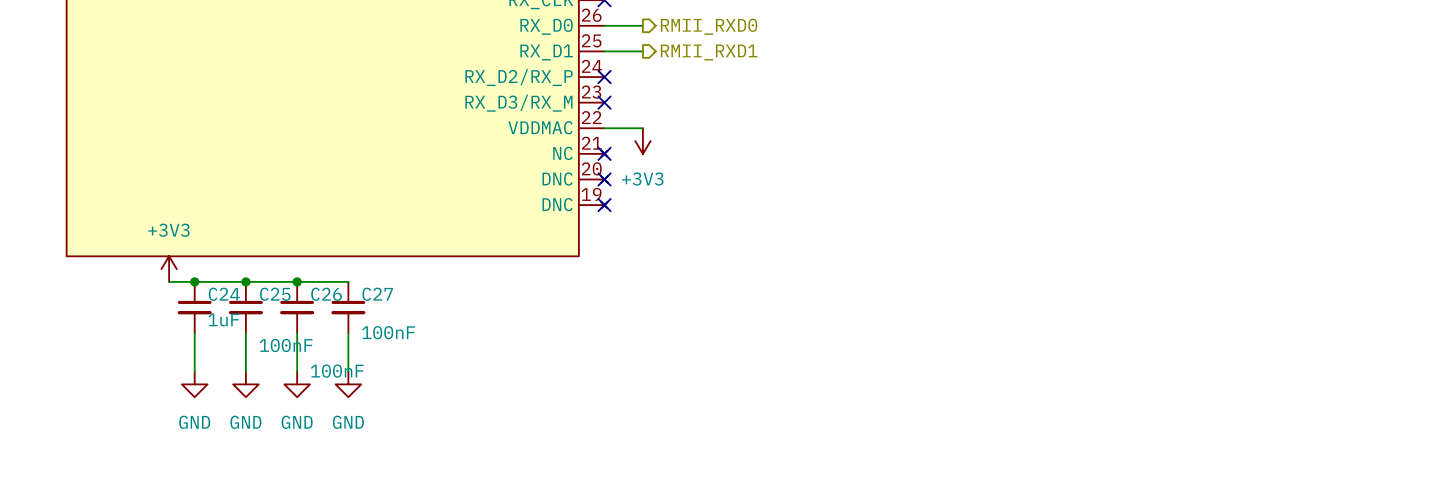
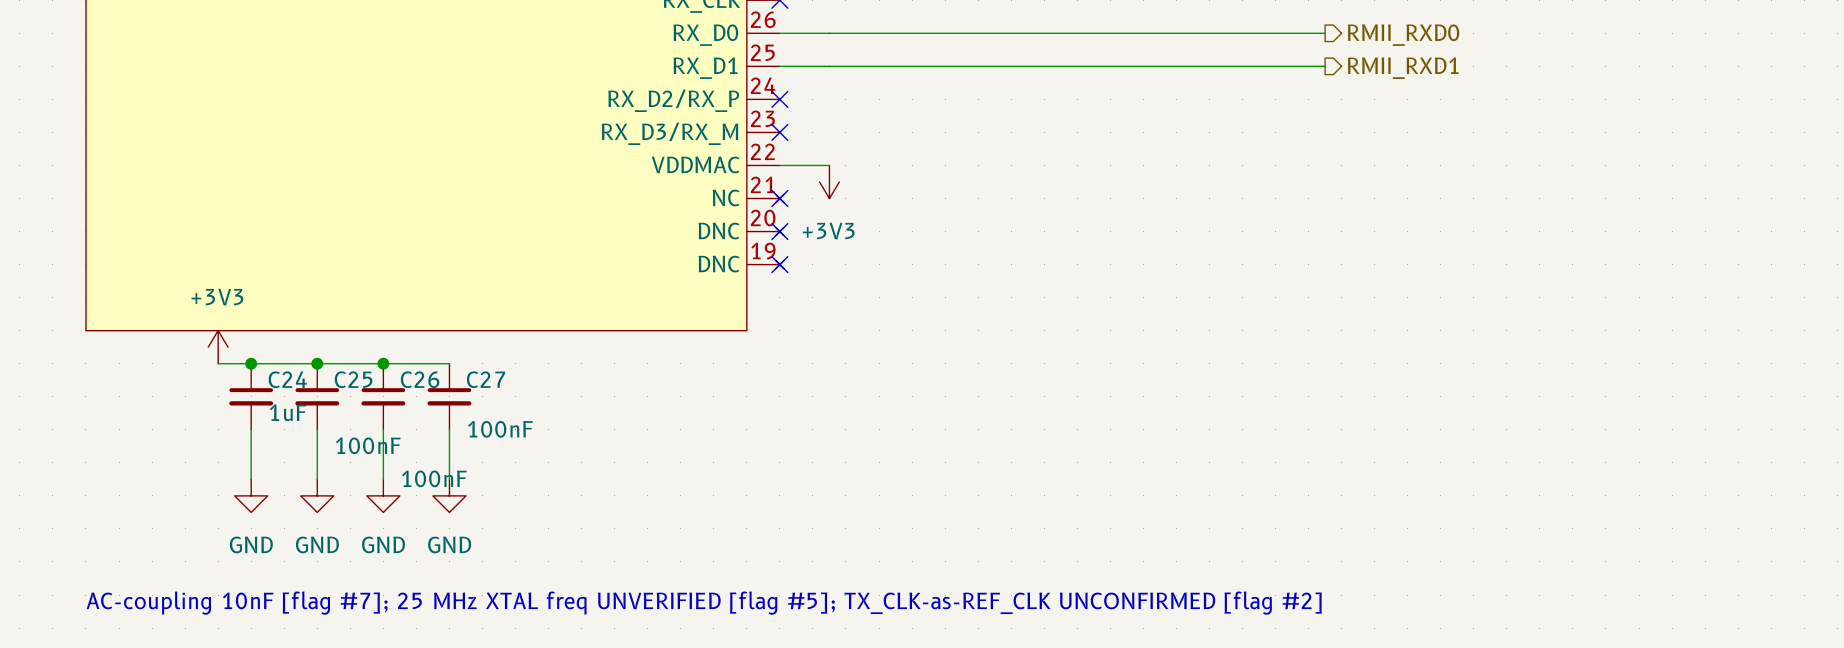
wire: none -> (829, 33) (1325, 33)
hierarchical label: RMII_RXD0 (709, 26) -> none
hierarchical label: none -> RMII_RXD0 (1403, 35)
wire: none -> (829, 66) (1325, 66)
hierarchical label: RMII_RXD1 (709, 52) -> none
hierarchical label: none -> RMII_RXD1 (1403, 68)
text: none -> AC-coupling 10nF [flag #7]; 25 MHz XTAL freq UNVERIFIED [flag #5]; TX_CLK-as-REF_CLK UNCONFIRMED [flag #2] (704, 603)

